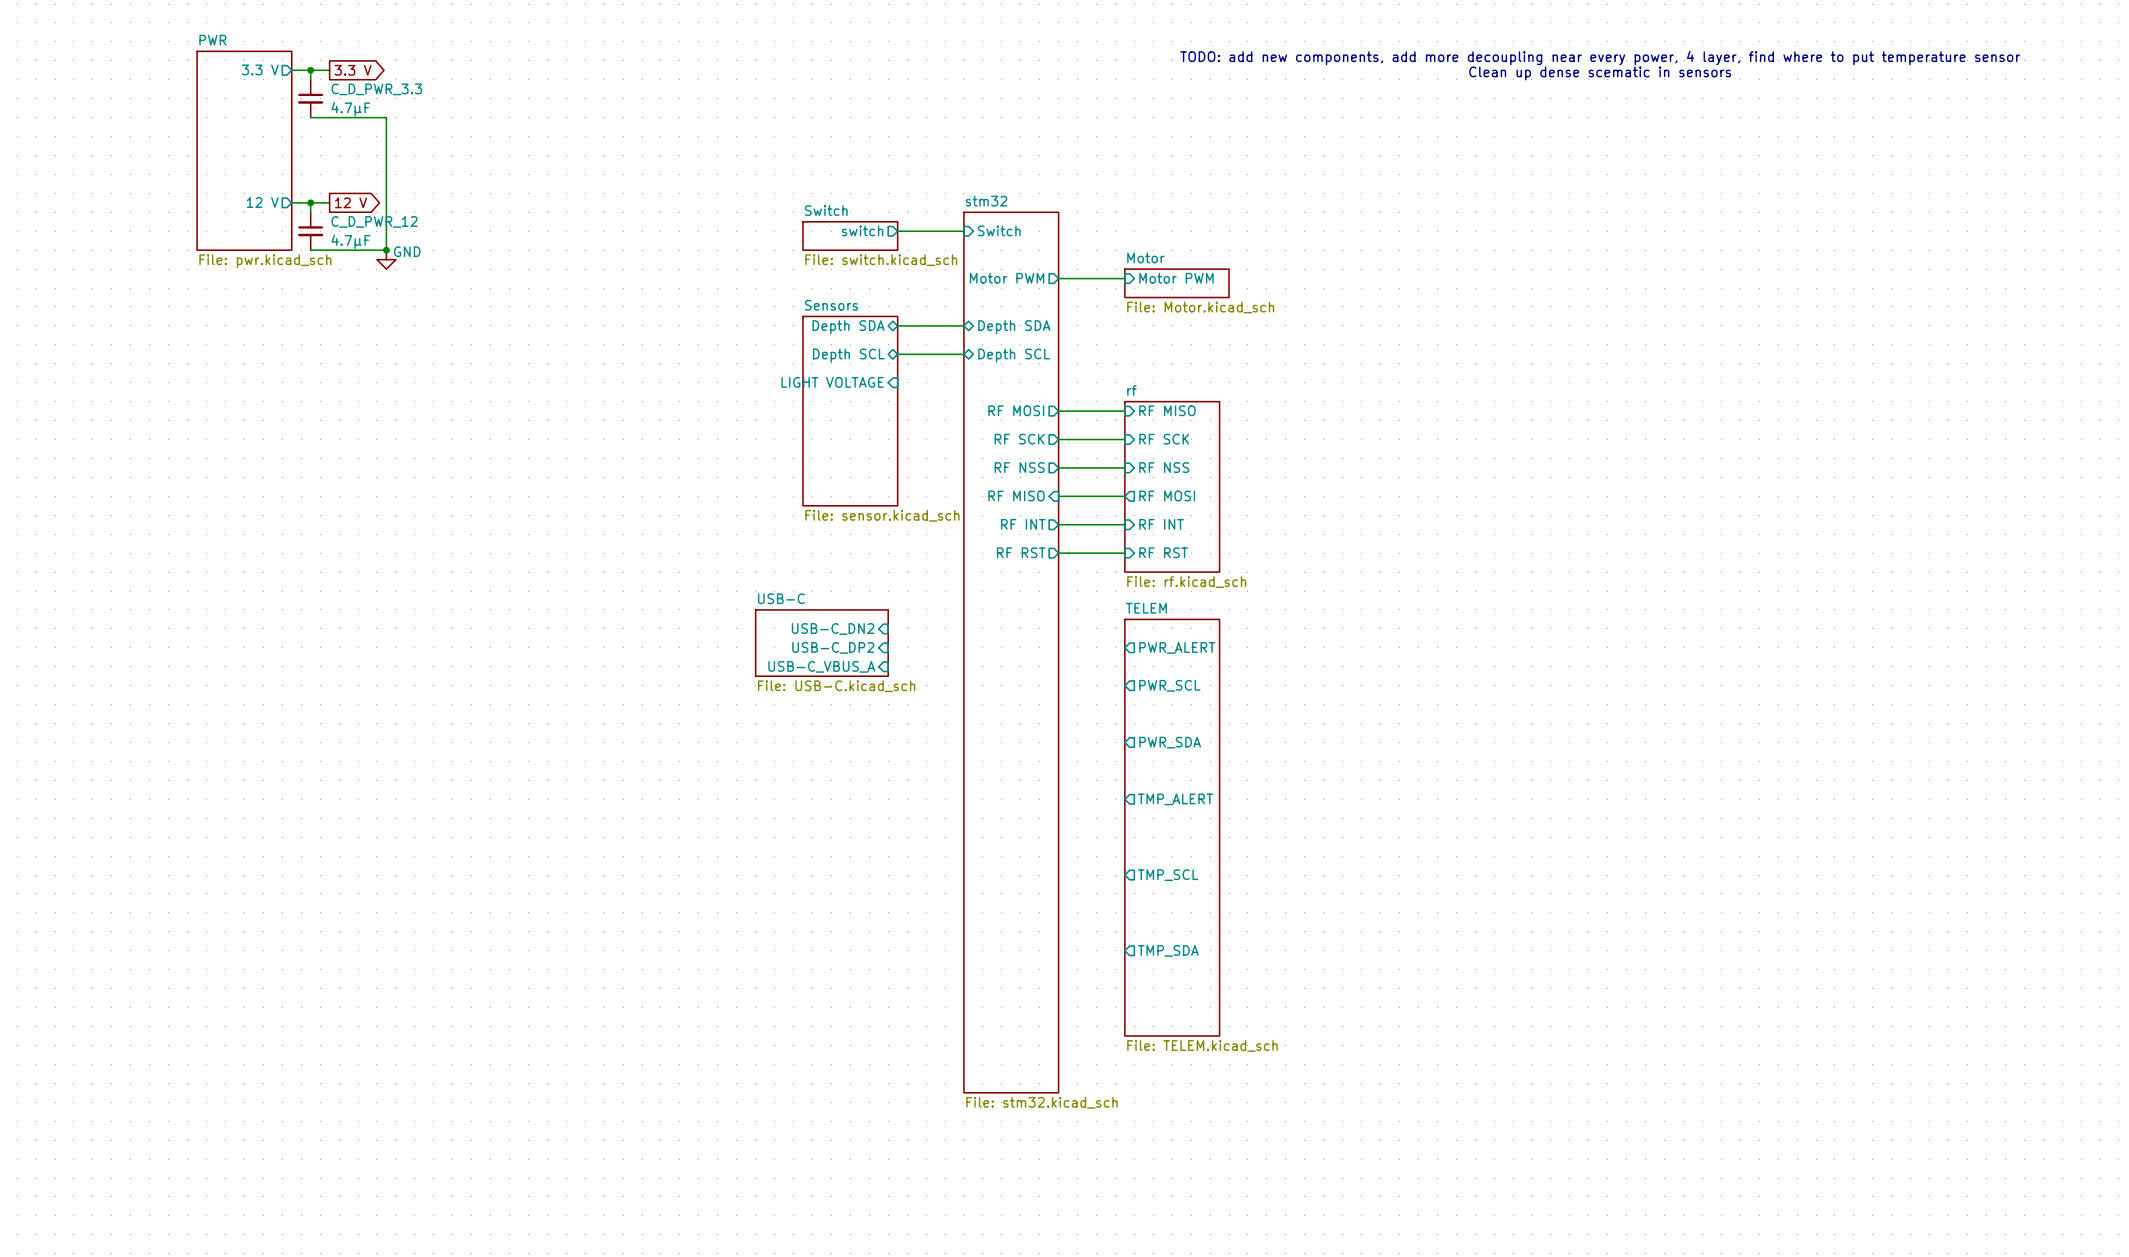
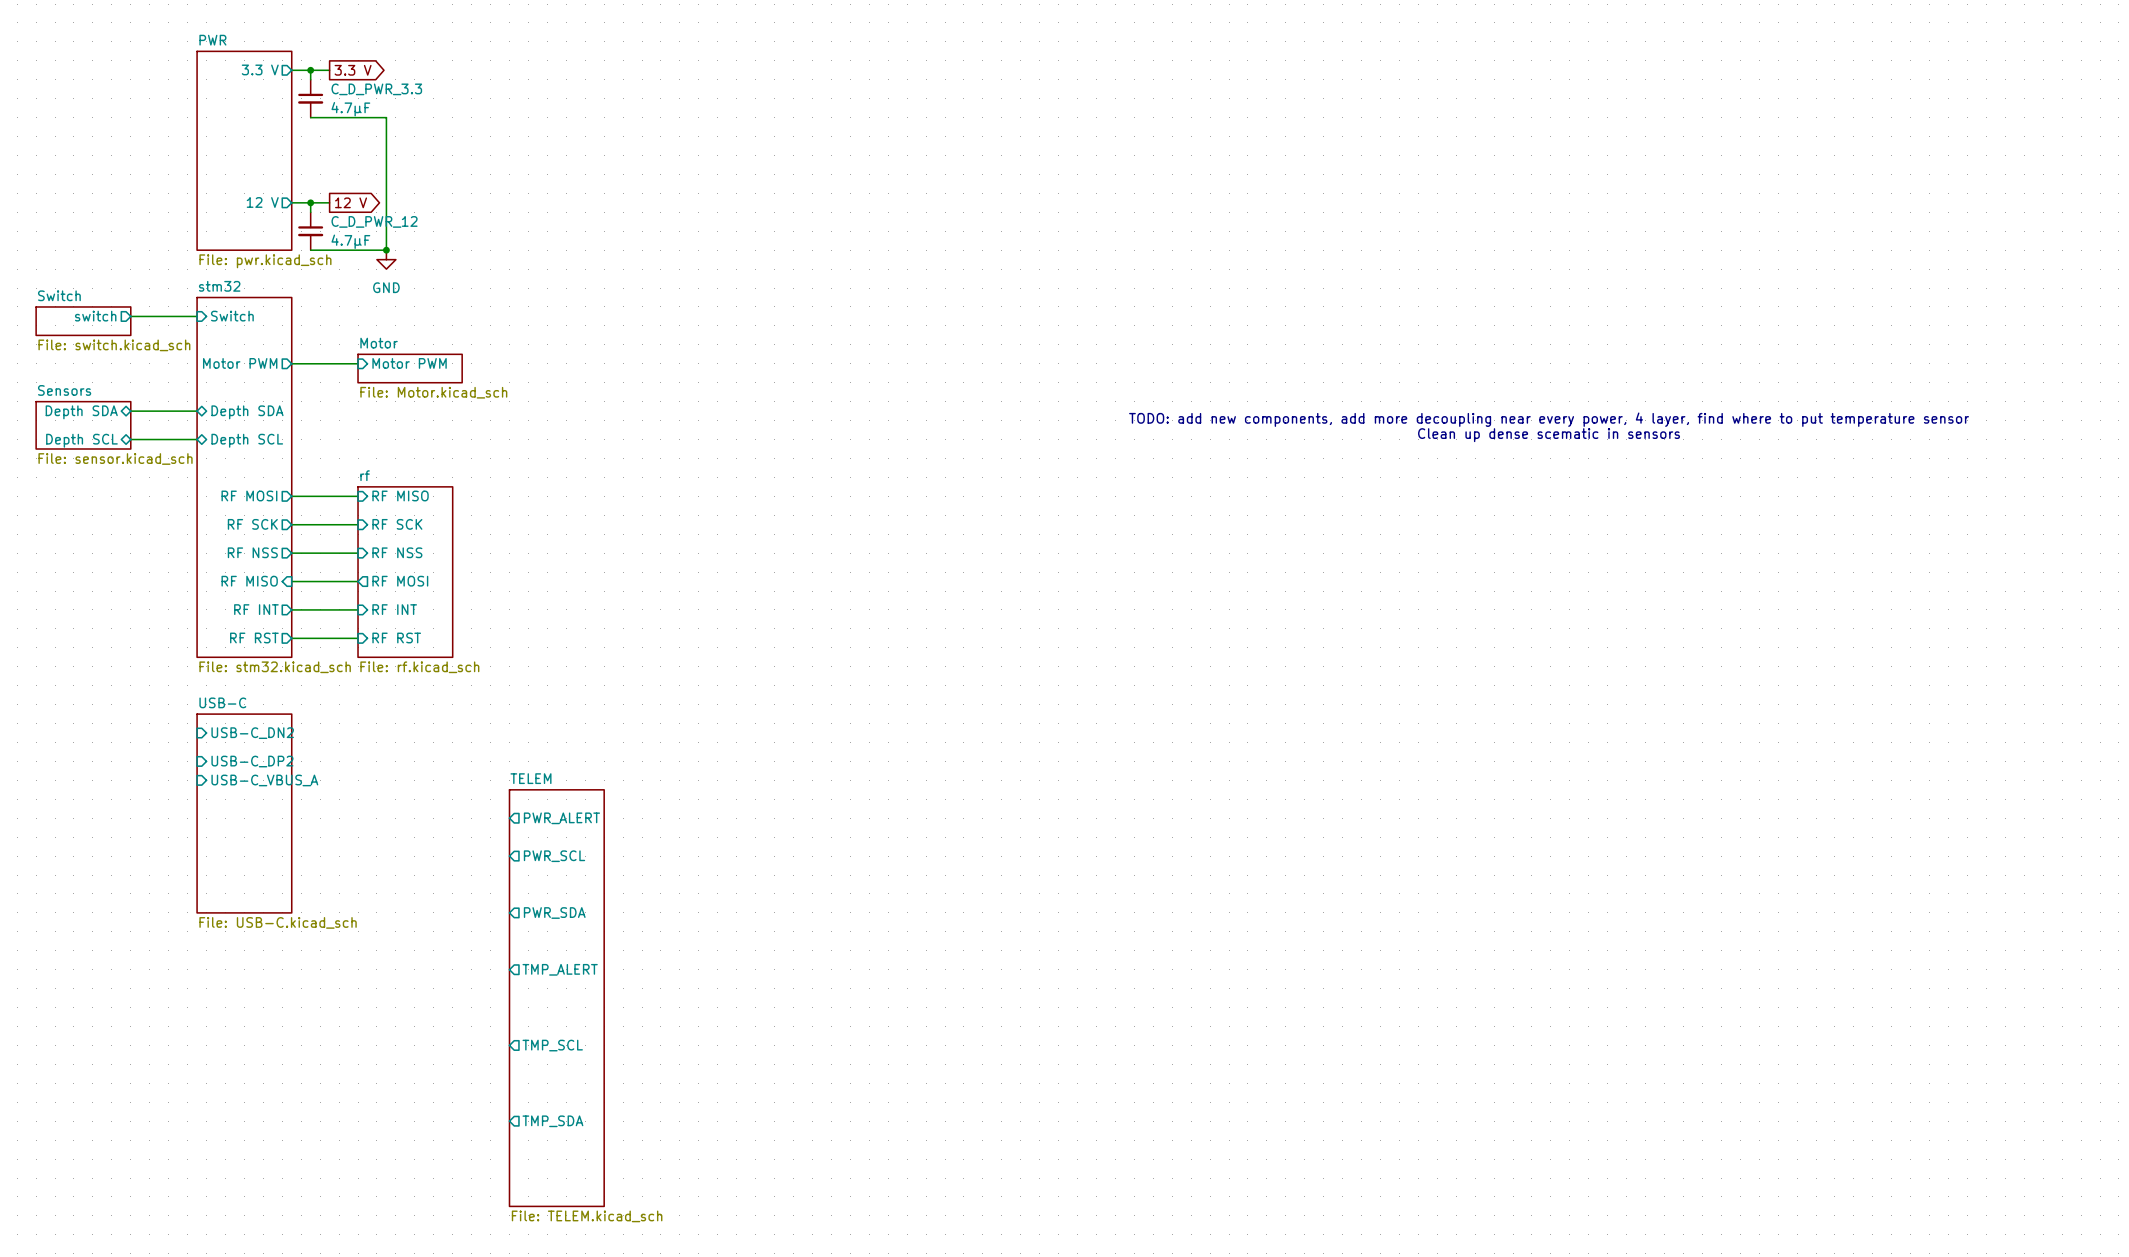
text: TODO: add new components, add more decoupling near every power, 4 layer, find where to put temperature sensor (1600, 58) -> none
text: Clean up dense scematic in sensors (1600, 73) -> none
sheet stm32 name position: stm32 (986, 201) -> stm32 (219, 286)
sheet stm32 shape: [963, 211, 1060, 1094] -> [196, 296, 293, 658]
sheet pin: switch (862, 230) -> none
sheet pin: Switch (999, 230) -> none
wire: (897, 231) (963, 231) -> none
sheet Switch: File: switch.kicad_sch (850, 235) -> none
power symbol text position: GND (407, 251) -> GND (386, 287)
sheet pin: Motor PWM (1007, 278) -> none
wire: (1058, 278) (1124, 278) -> none
sheet pin: Motor PWM (1176, 278) -> none
sheet Motor: File: Motor.kicad_sch (1176, 283) -> none
sheet pin: none -> switch (95, 316)
wire: none -> (130, 316) (197, 316)
sheet pin: none -> Switch (232, 316)
sheet Switch: none -> File: switch.kicad_sch (83, 321)
wire: (897, 325) (963, 325) -> none
sheet pin: Depth SDA (848, 327) -> none
sheet pin: Depth SDA (1014, 327) -> none
wire: (897, 354) (963, 354) -> none
sheet pin: Depth SCL (848, 355) -> none
sheet pin: Depth SCL (1014, 355) -> none
sheet pin: none -> Motor PWM (240, 363)
wire: none -> (291, 363) (358, 363)
sheet pin: none -> Motor PWM (409, 363)
sheet Motor: none -> File: Motor.kicad_sch (410, 368)
sheet pin: LIGHT VOLTAGE (832, 382) -> none
sheet pin: RF MOSI (1016, 410) -> none
sheet pin: RF MISO (1167, 410) -> none
wire: none -> (130, 411) (197, 411)
sheet Sensors: File: sensor.kicad_sch (850, 411) -> none
wire: (1058, 411) (1124, 411) -> none
sheet pin: none -> Depth SDA (81, 412)
sheet pin: none -> Depth SDA (247, 412)
text: none -> TODO: add new components, add more decoupling near every power, 4 layer, find where to put temperature sensor (1549, 419)
sheet Sensors: none -> File: sensor.kicad_sch (83, 425)
text: none -> Clean up dense scematic in sensors (1549, 435)
wire: none -> (130, 439) (197, 439)
sheet pin: RF SCK (1019, 439) -> none
wire: (1058, 439) (1124, 439) -> none
sheet pin: RF SCK (1164, 439) -> none
sheet pin: none -> Depth SCL (81, 440)
sheet pin: none -> Depth SCL (247, 440)
sheet pin: RF NSS (1019, 467) -> none
wire: (1058, 467) (1124, 467) -> none
sheet pin: RF NSS (1164, 467) -> none
sheet rf: File: rf.kicad_sch (1172, 486) -> none
sheet pin: none -> RF MOSI (249, 495)
sheet pin: none -> RF MISO (400, 495)
sheet pin: RF MISO (1016, 495) -> none
sheet pin: RF MOSI (1167, 495) -> none
wire: none -> (291, 496) (358, 496)
wire: (1058, 496) (1124, 496) -> none
sheet pin: none -> RF SCK (252, 524)
wire: none -> (291, 524) (358, 524)
sheet pin: none -> RF SCK (397, 524)
sheet pin: RF INT (1023, 524) -> none
wire: (1058, 524) (1124, 524) -> none
sheet pin: RF INT (1161, 524) -> none
sheet pin: none -> RF NSS (252, 552)
sheet pin: none -> RF NSS (397, 552)
sheet pin: RF RST (1021, 552) -> none
sheet pin: RF RST (1163, 552) -> none
wire: none -> (291, 553) (358, 553)
wire: (1058, 553) (1124, 553) -> none
sheet rf: none -> File: rf.kicad_sch (405, 572)
sheet pin: none -> RF MISO (249, 581)
wire: none -> (291, 581) (358, 581)
sheet pin: none -> RF MOSI (400, 581)
sheet pin: none -> RF INT (256, 609)
wire: none -> (291, 609) (358, 609)
sheet pin: none -> RF INT (394, 609)
sheet pin: USB-C_DN2 (833, 628) -> none
sheet pin: none -> RF RST (254, 638)
wire: none -> (291, 638) (358, 638)
sheet pin: none -> RF RST (396, 638)
sheet USB-C: File: USB-C.kicad_sch (821, 643) -> none
sheet pin: USB-C_DP2 (833, 647) -> none
sheet pin: PWR_ALERT (1177, 647) -> none
sheet pin: USB-C_VBUS_A (821, 666) -> none
sheet pin: PWR_SCL (1169, 685) -> none
sheet pin: none -> USB-C_DN2 (252, 733)
sheet pin: PWR_SDA (1170, 742) -> none
sheet pin: none -> USB-C_DP2 (252, 761)
sheet pin: none -> USB-C_VBUS_A (264, 780)
sheet pin: TMP_ALERT (1175, 799) -> none
sheet USB-C: none -> File: USB-C.kicad_sch (244, 813)
sheet pin: none -> PWR_ALERT (561, 818)
sheet TELEM: File: TELEM.kicad_sch (1172, 827) -> none
sheet pin: none -> PWR_SCL (554, 856)
sheet pin: TMP_SCL (1168, 875) -> none
sheet pin: none -> PWR_SDA (554, 913)
sheet pin: TMP_SDA (1168, 950) -> none
sheet pin: none -> TMP_ALERT (560, 969)
sheet TELEM: none -> File: TELEM.kicad_sch (556, 998)
sheet pin: none -> TMP_SCL (552, 1045)
sheet stm32 value position: File: stm32.kicad_sch (1042, 1102) -> File: stm32.kicad_sch (275, 667)
sheet pin: none -> TMP_SDA (552, 1121)

